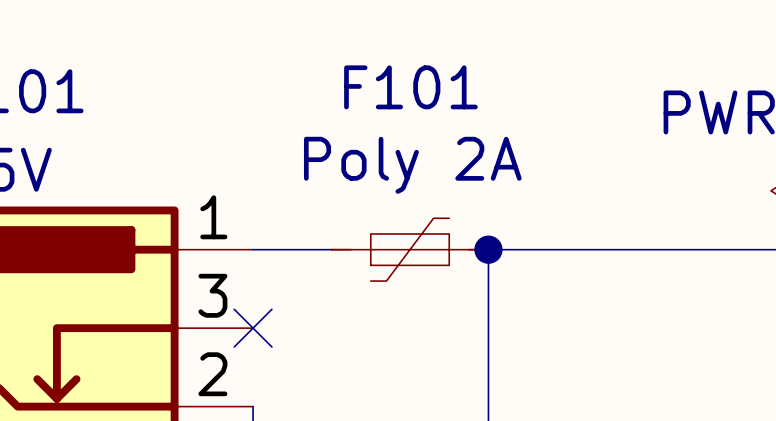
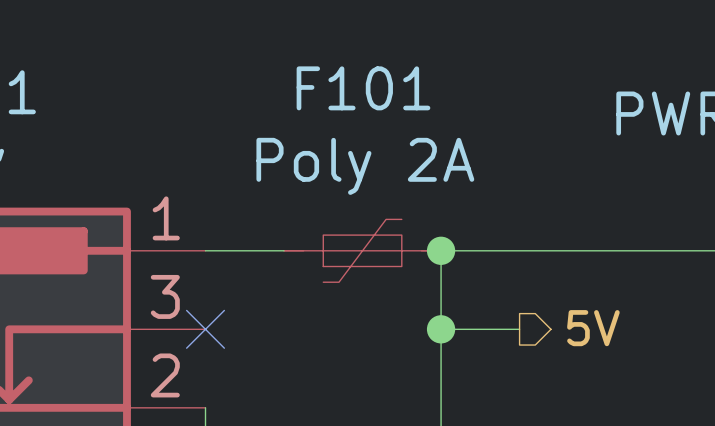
hierarchical label: none -> 5V (593, 328)
wire: none -> (441, 329) (519, 329)
junction: none -> (441, 329)

